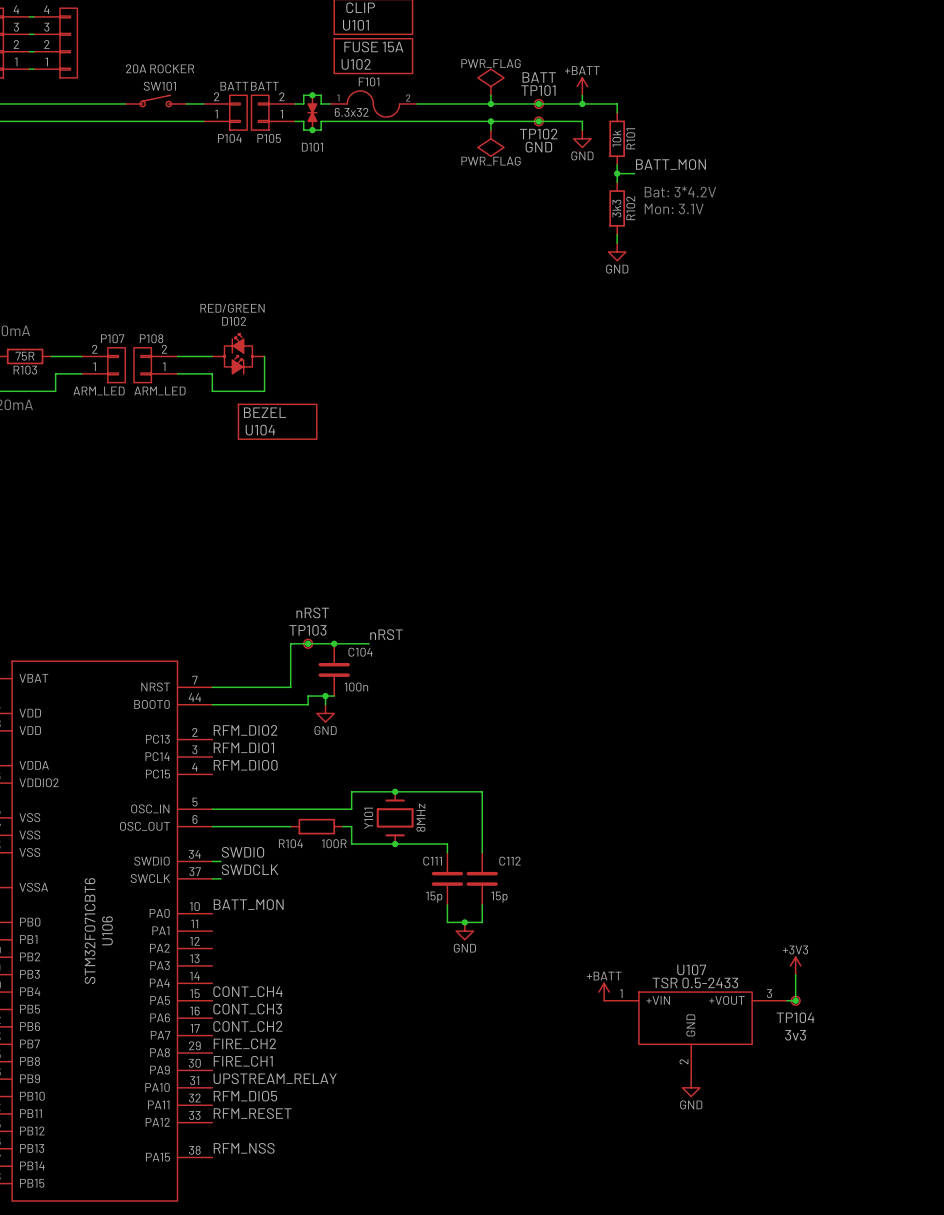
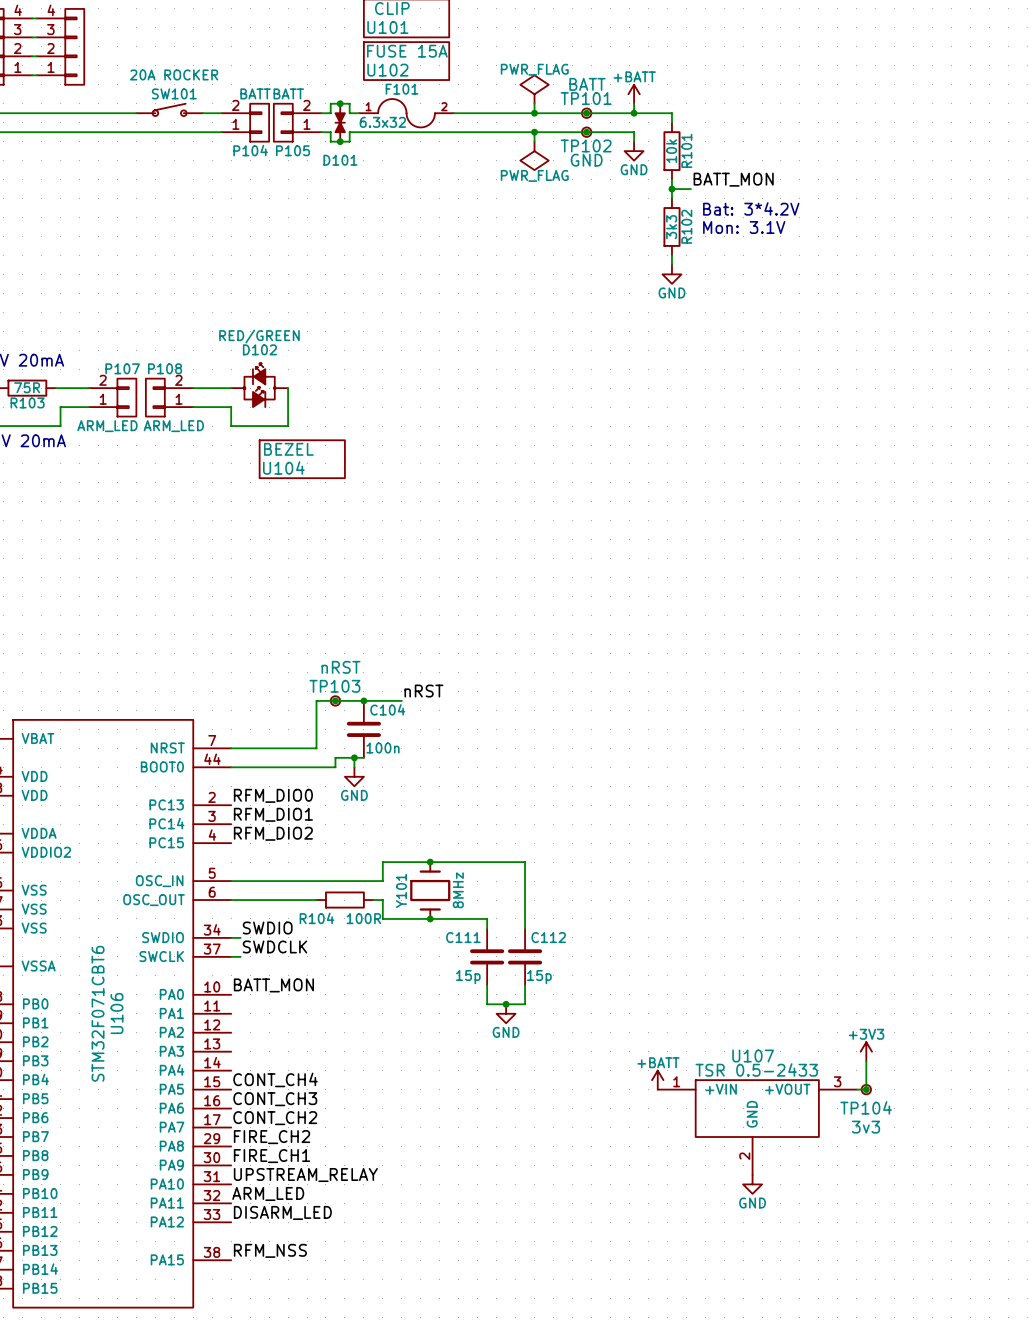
label: RFM_DIO2 (245, 730) -> RFM_DIO0 (273, 795)
label: RFM_DIO0 (245, 765) -> RFM_DIO2 (273, 833)
label: RFM_DIO5 (245, 1096) -> ARM_LED (268, 1193)
label: RFM_RESET (252, 1113) -> DISARM_LED (282, 1212)

